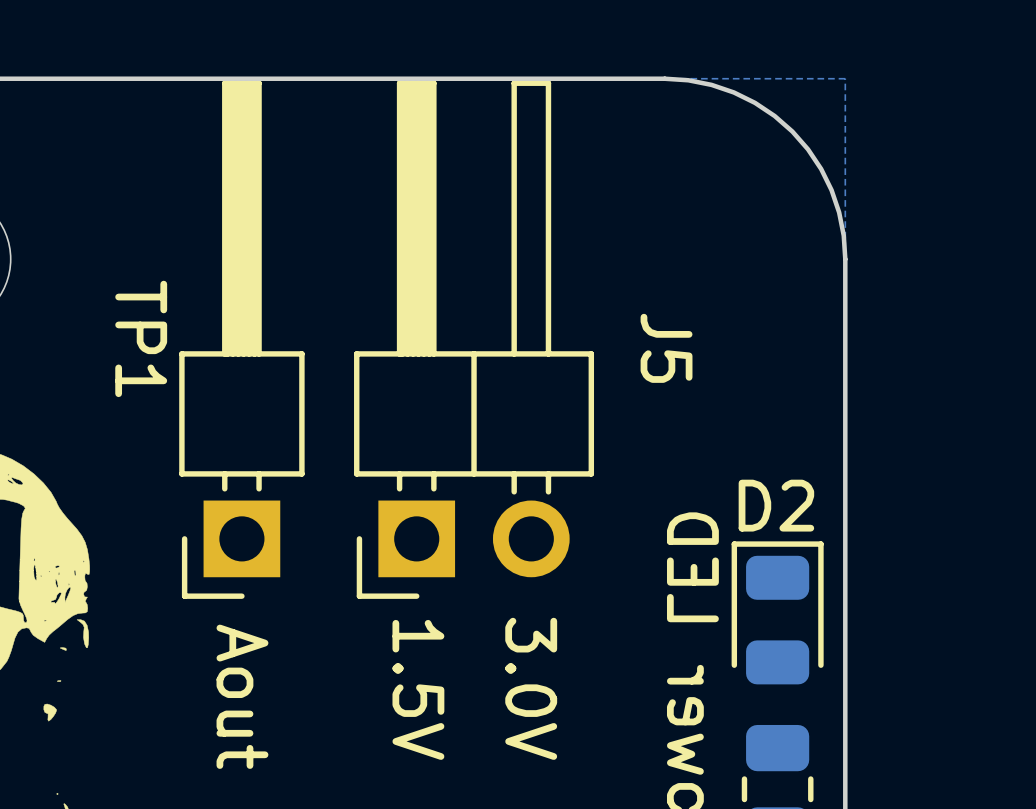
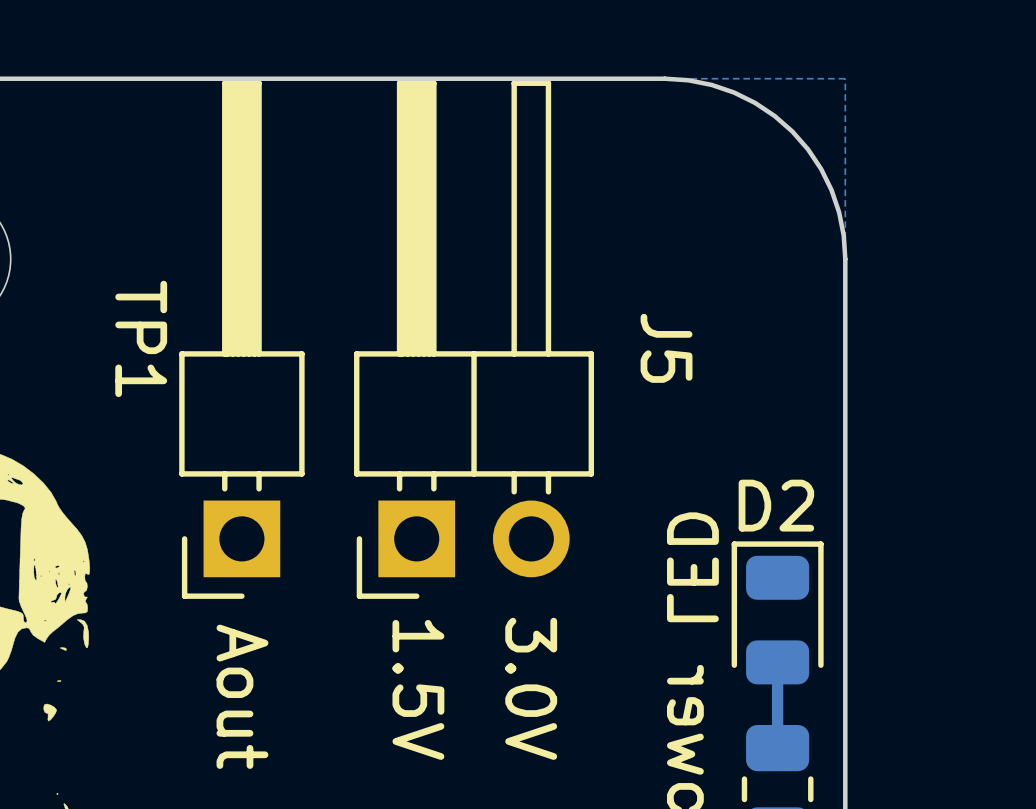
track: none -> (777, 662) (777, 748)

